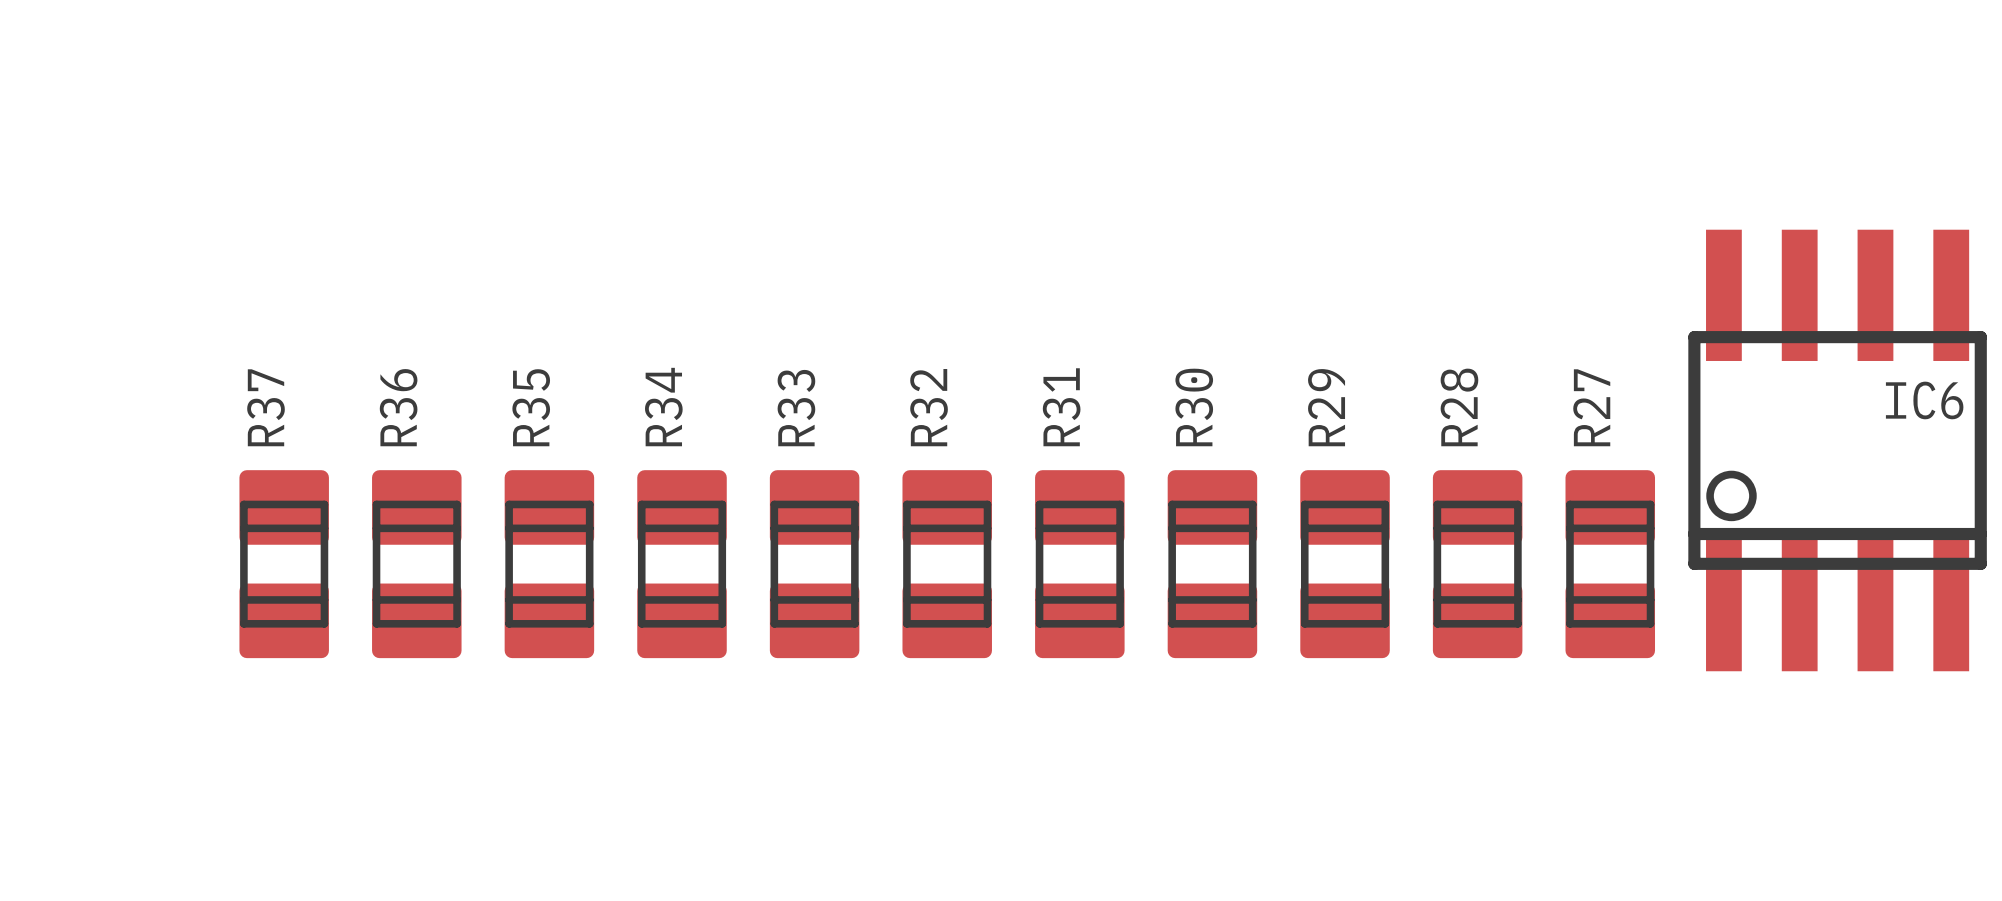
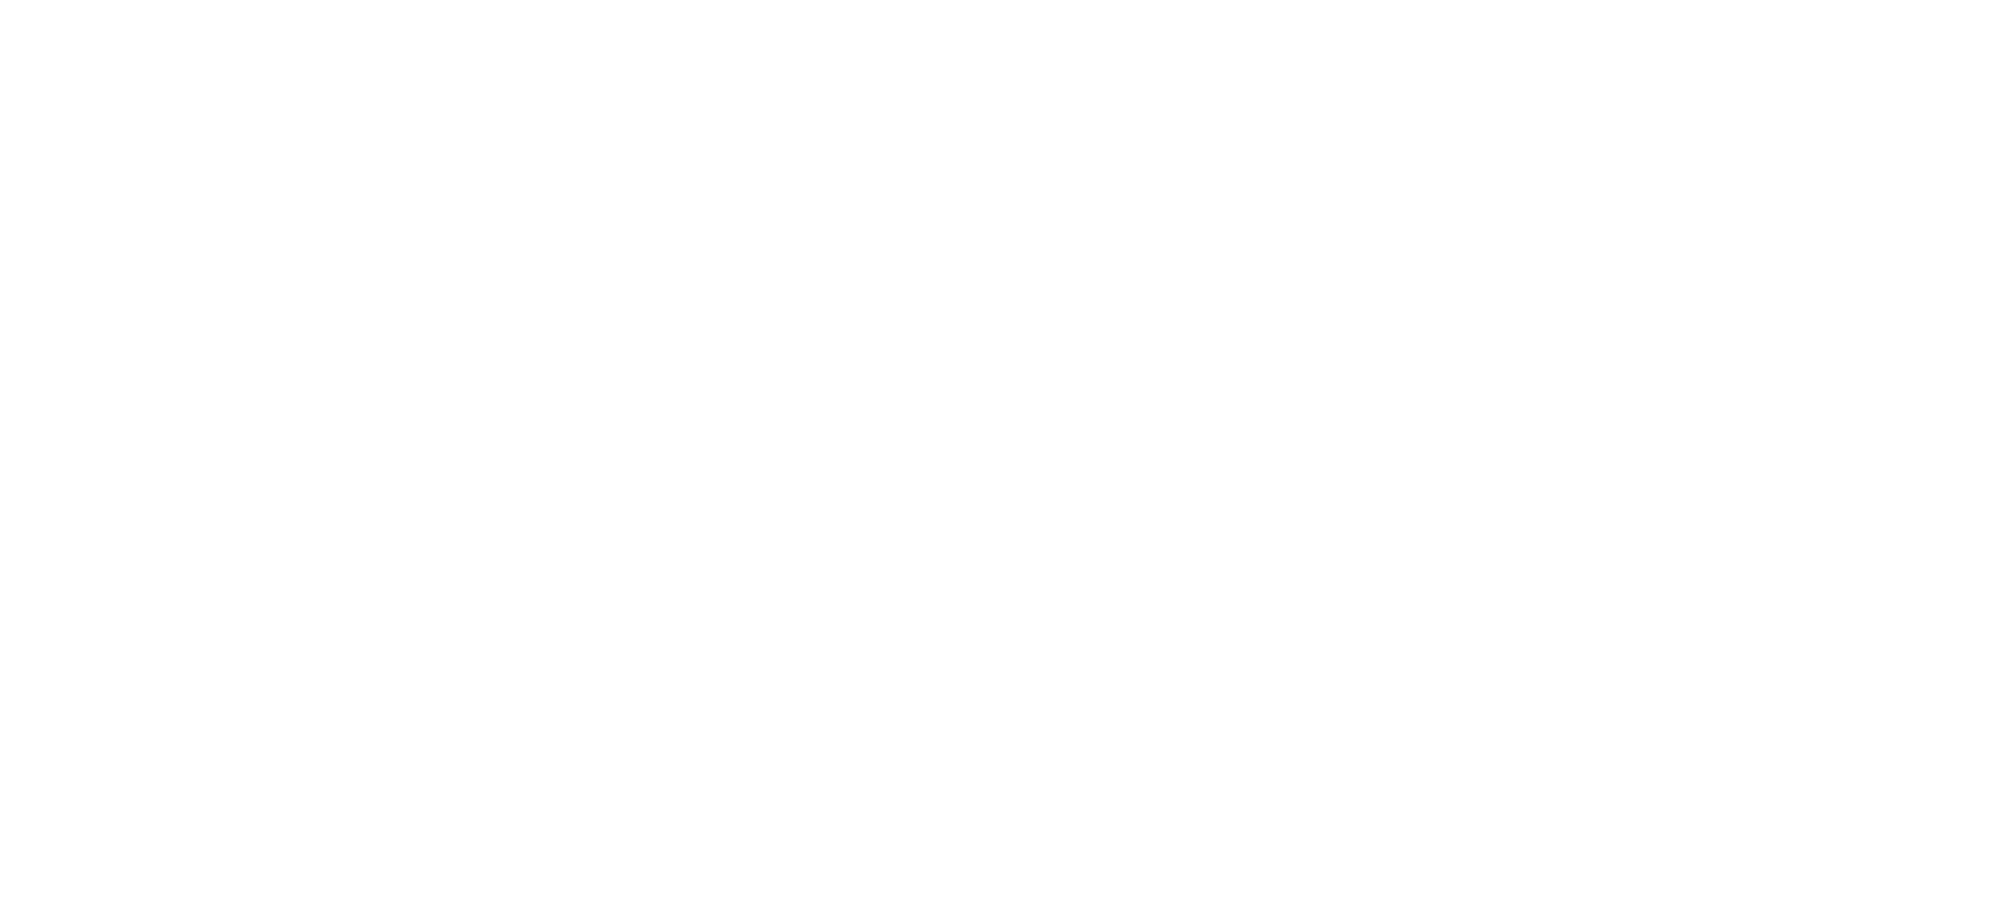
IC6: (1837, 450) -> none
R37: (284, 564) -> none
R36: (416, 564) -> none
R35: (549, 564) -> none
R34: (682, 564) -> none
R33: (814, 564) -> none
R32: (947, 564) -> none
R31: (1079, 564) -> none
R30: (1212, 564) -> none
R29: (1345, 564) -> none
R28: (1477, 564) -> none
R27: (1610, 564) -> none

